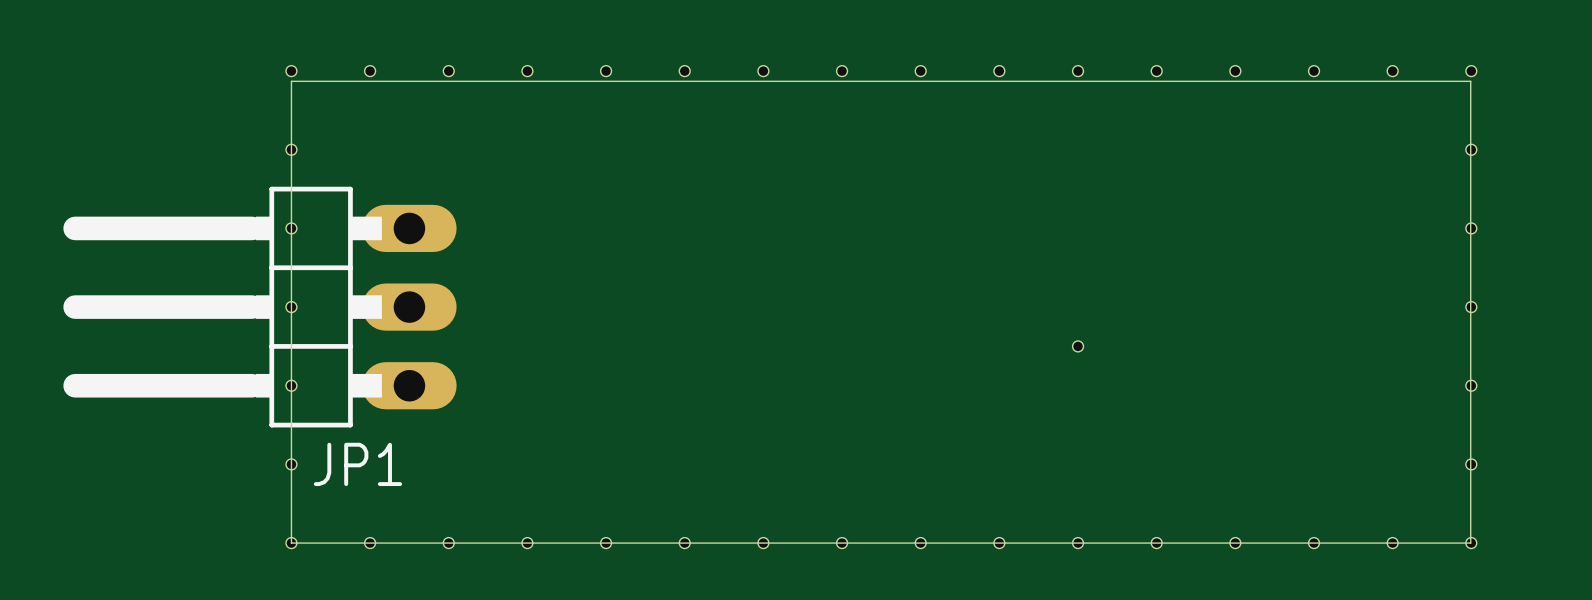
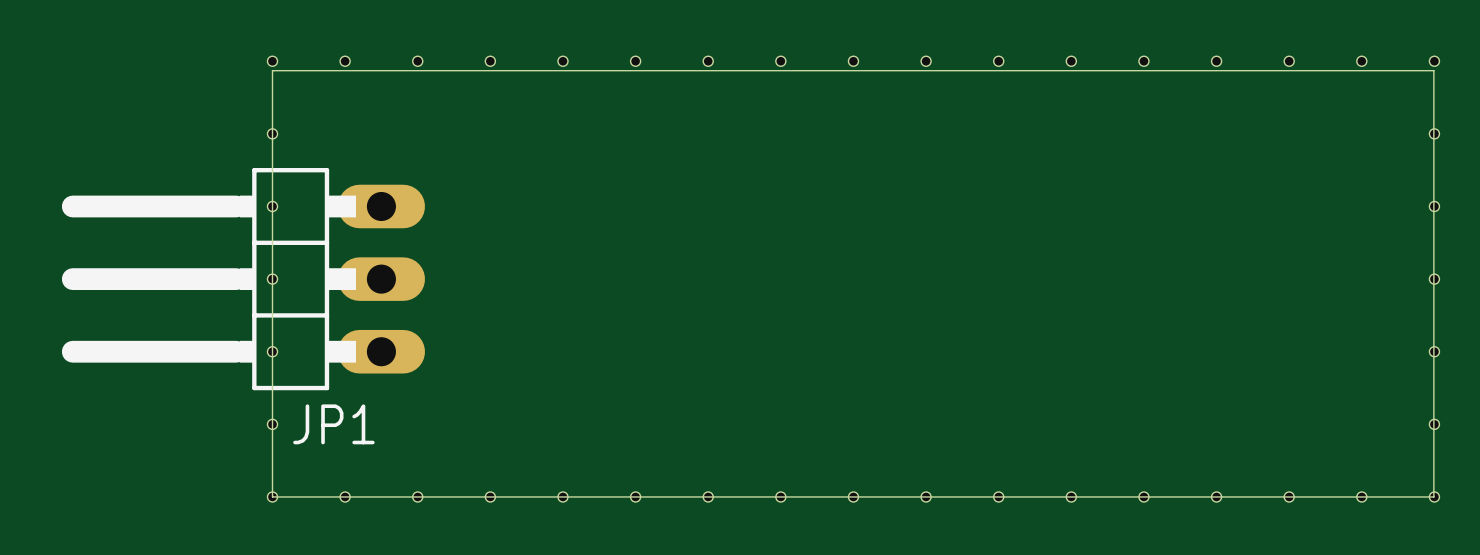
hole: none -> (1434, 61)
board edge: (1470, 81) (1470, 543) -> (1361, 70) (1433, 70) (1433, 496) (1361, 496)
hole: (1471, 149) -> none
hole: none -> (1434, 133)
hole: (1471, 228) -> none
hole: none -> (1434, 206)
hole: (1471, 307) -> none
hole: none -> (1434, 279)
hole: (1078, 346) -> none
hole: (1471, 385) -> none
hole: none -> (1434, 351)
hole: (1471, 464) -> none
hole: none -> (1434, 424)
hole: none -> (1434, 496)

